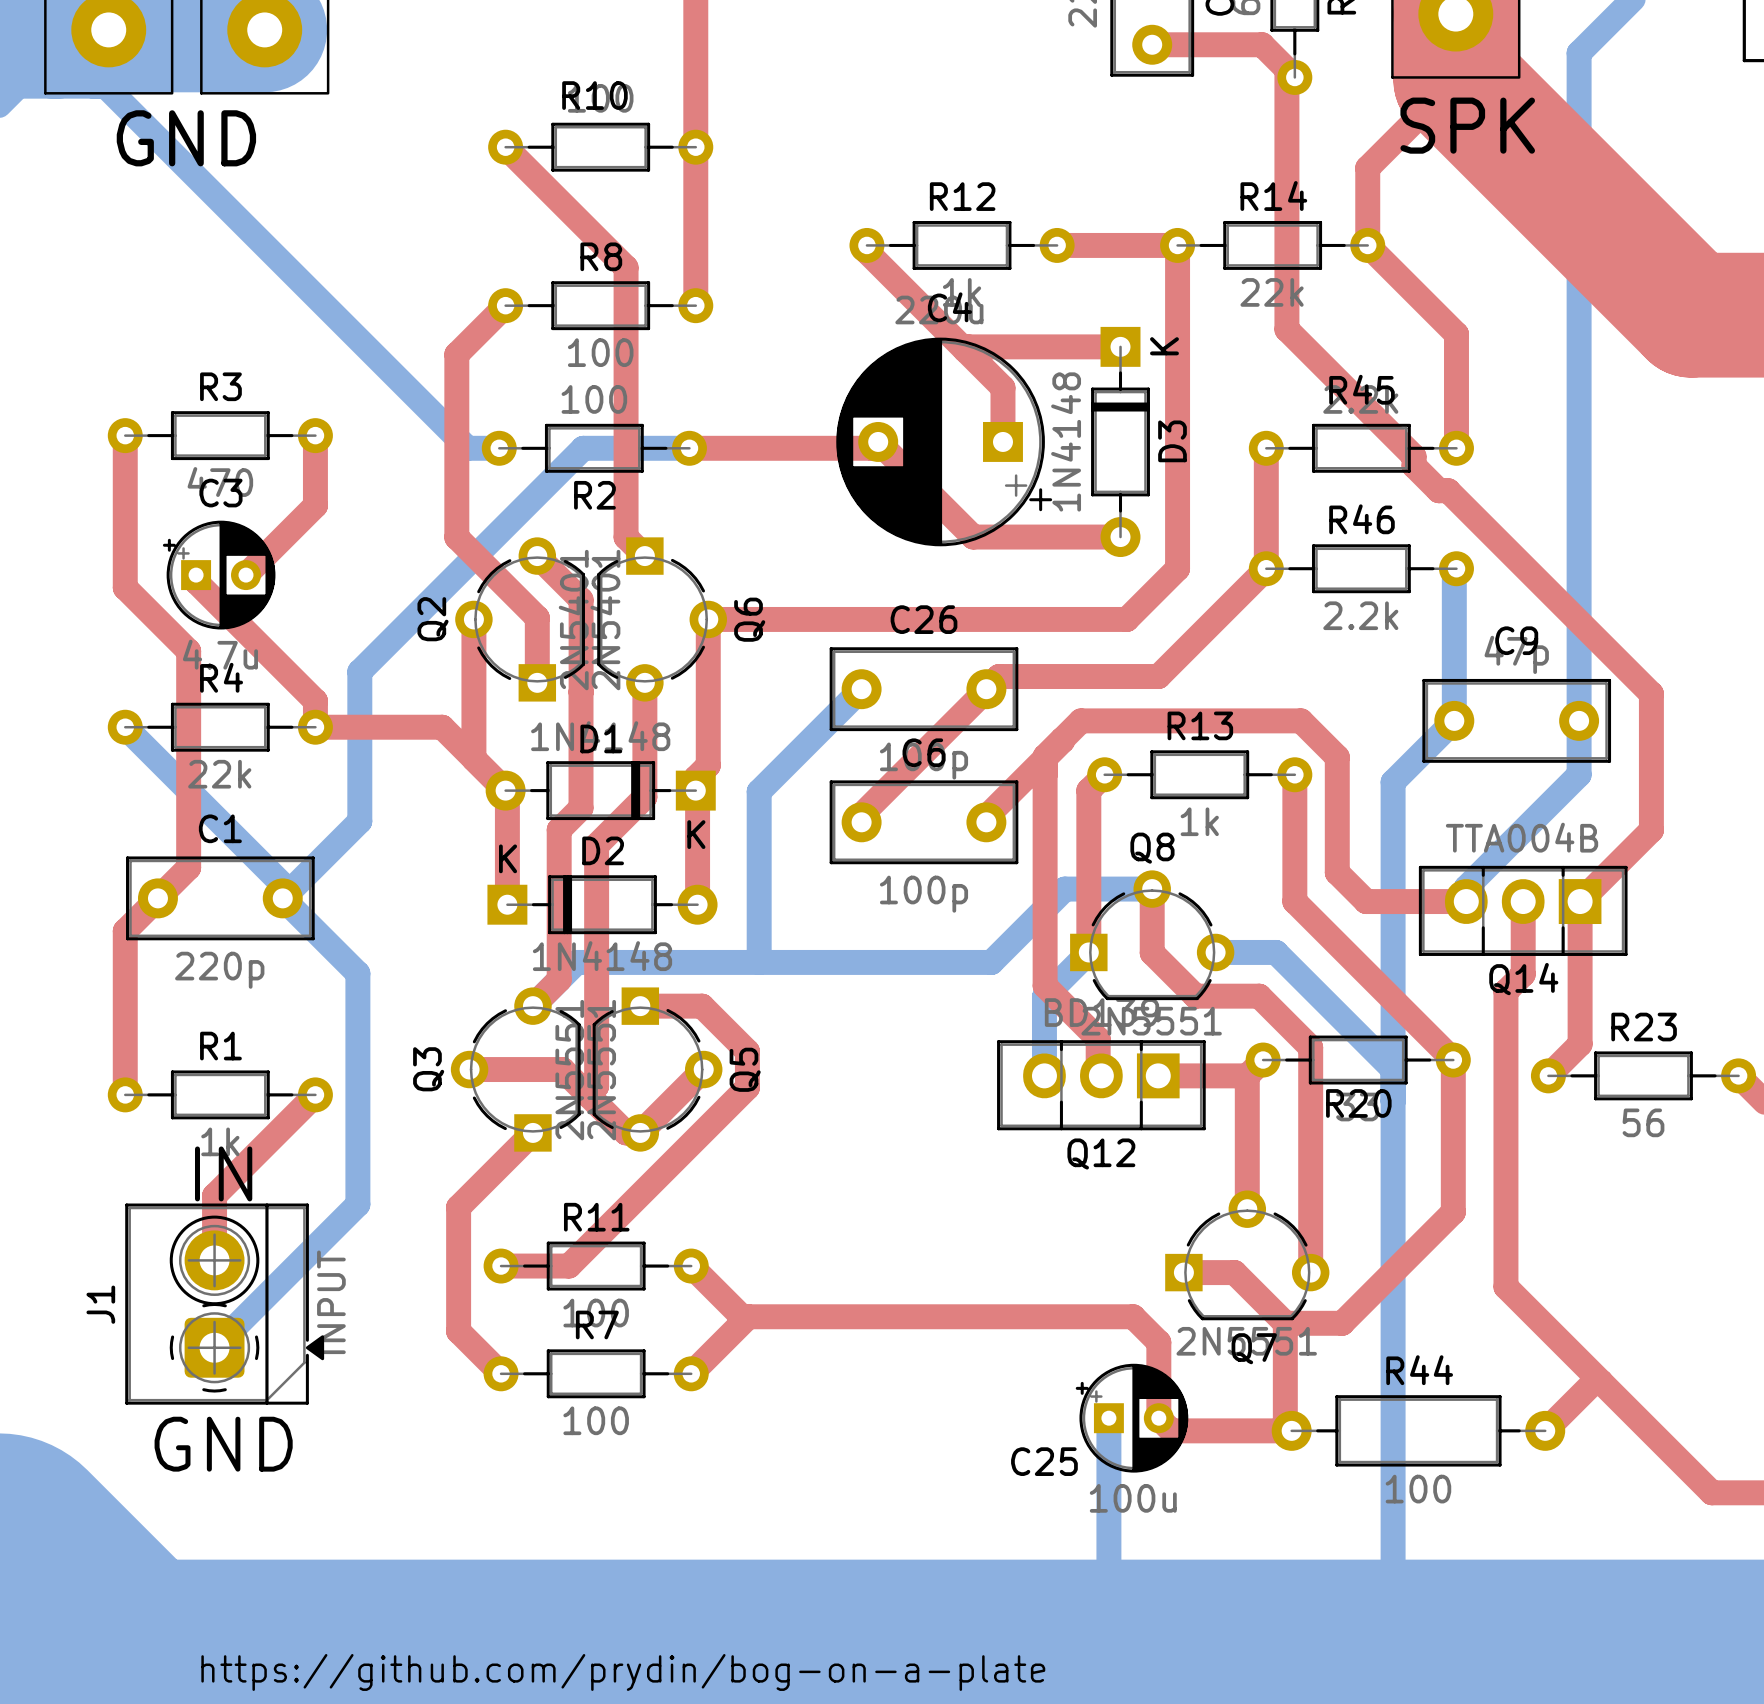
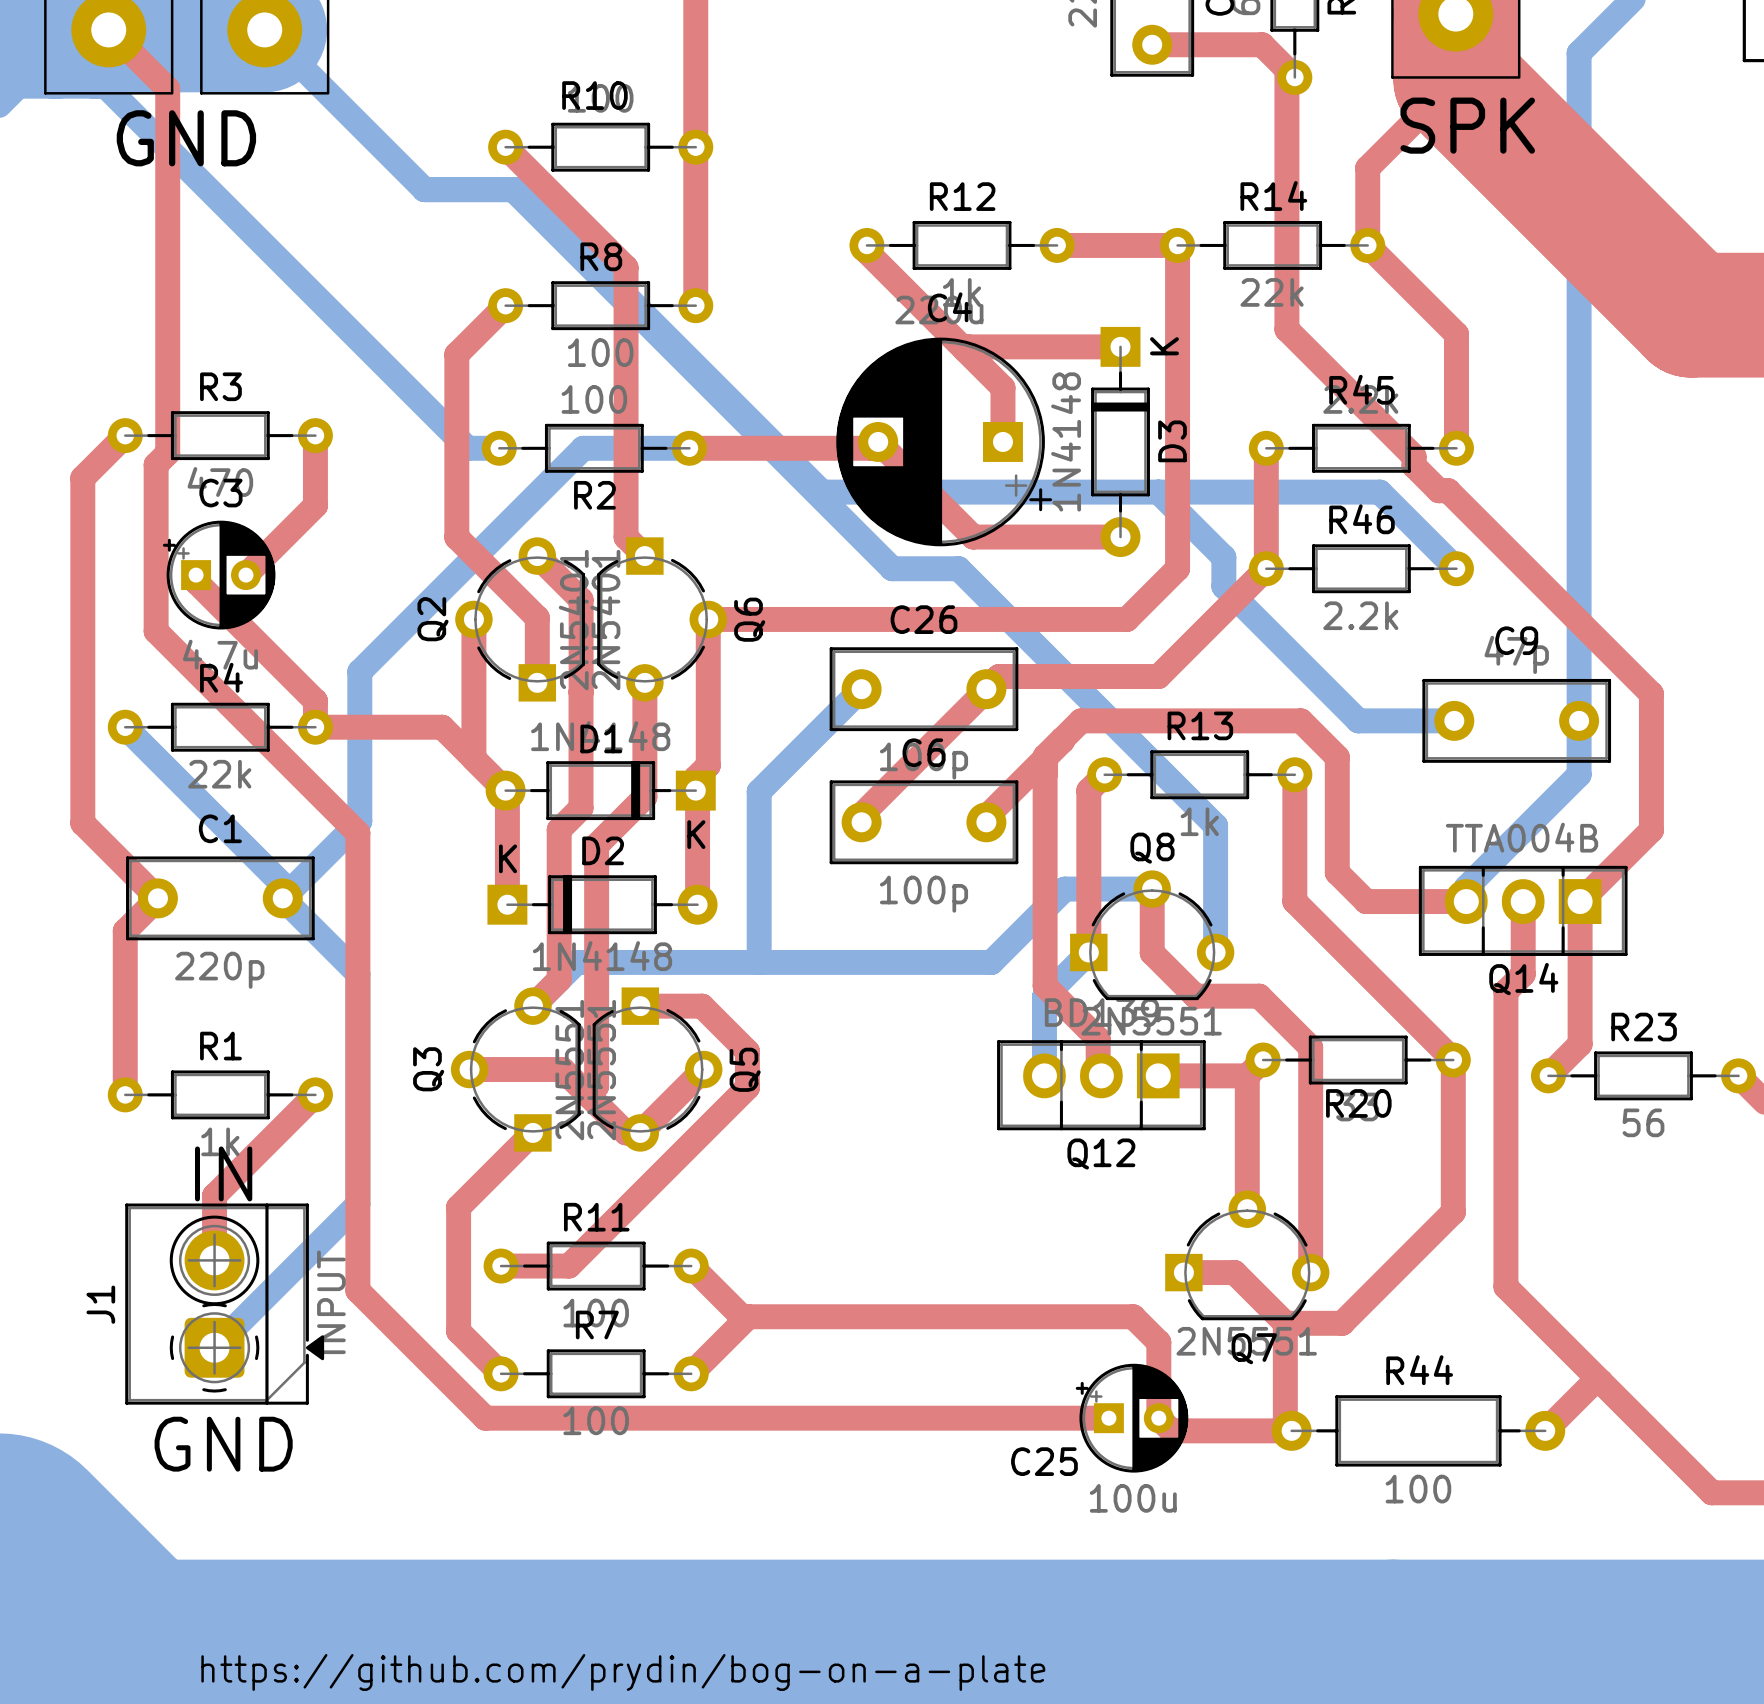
top track: none -> (108, 29) (167, 88) (167, 453) (156, 464) (156, 631) (357, 833) (357, 1290) (485, 1418) (1108, 1418)
top track: (125, 435) (125, 587) (188, 651) (188, 867) (157, 898) -> (125, 435) (82, 478) (82, 823) (157, 898)
bottom track: none -> (1158, 492) (1223, 557) (1223, 586) (1358, 720) (1454, 720)
bottom track: (1456, 568) (1454, 570) (1454, 720) (1393, 782) (1393, 1684) -> (1456, 568) (1379, 492) (822, 492) (519, 189) (424, 189) (264, 29)
bottom track: (1215, 952) (1276, 952) (1393, 1069) -> (1215, 952) (1215, 825) (958, 568) (892, 568) (513, 189)
bottom track: (1108, 1418) (1108, 1566) -> none

